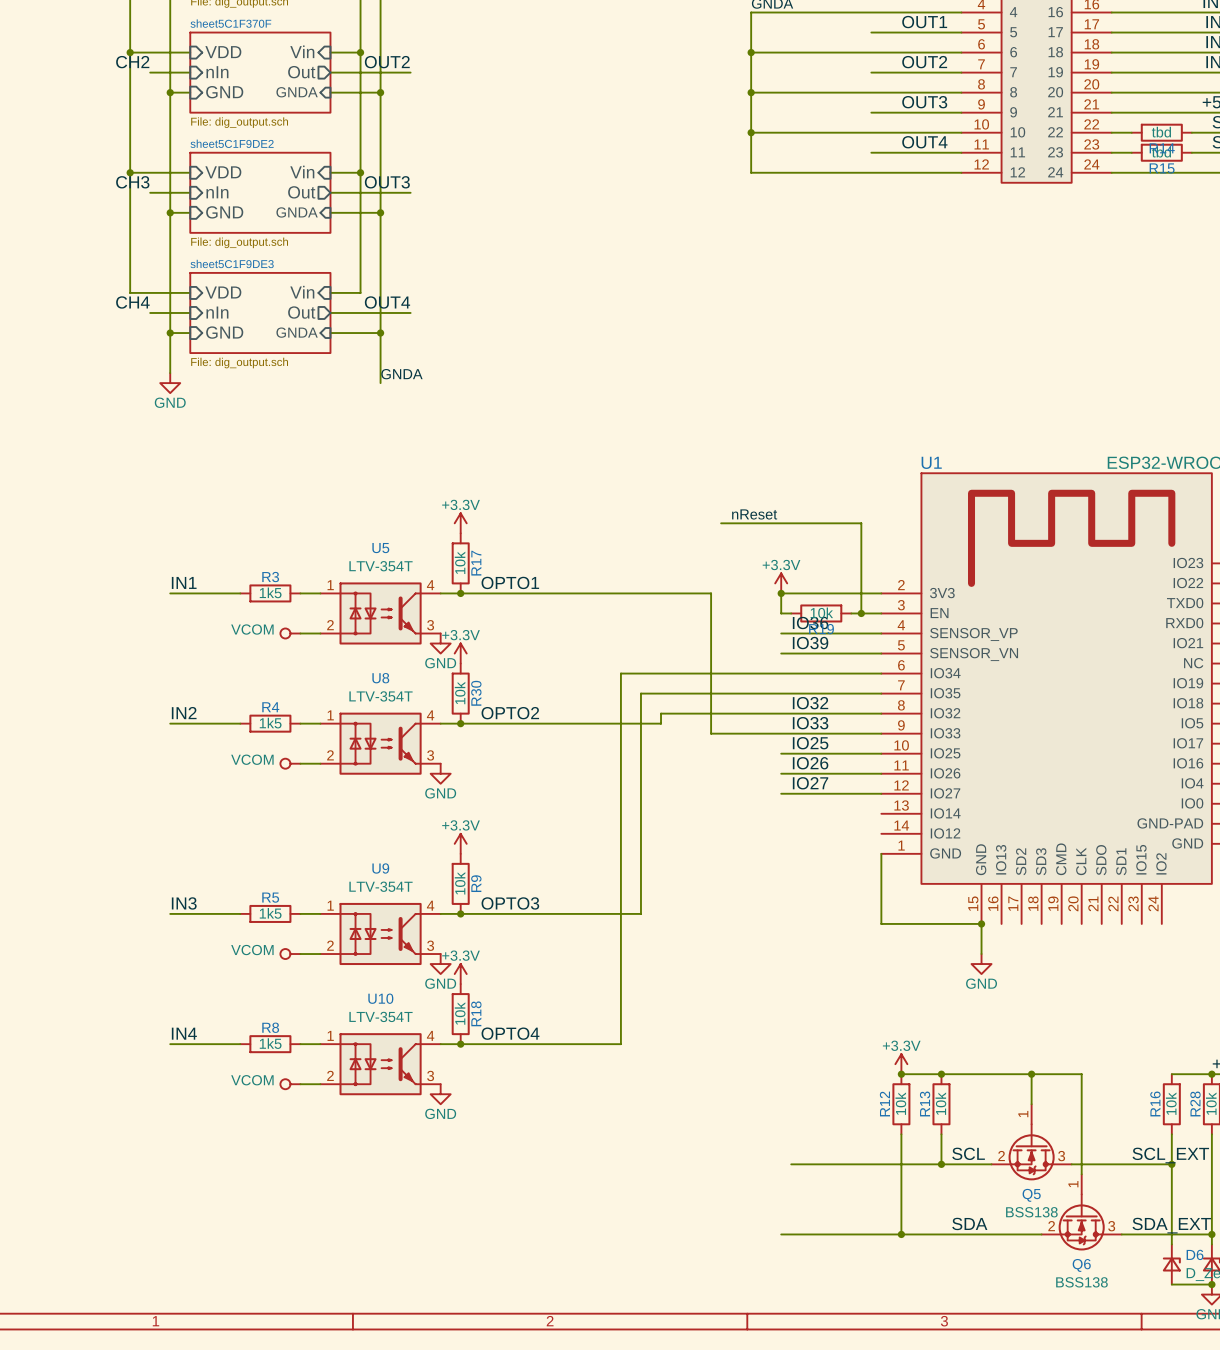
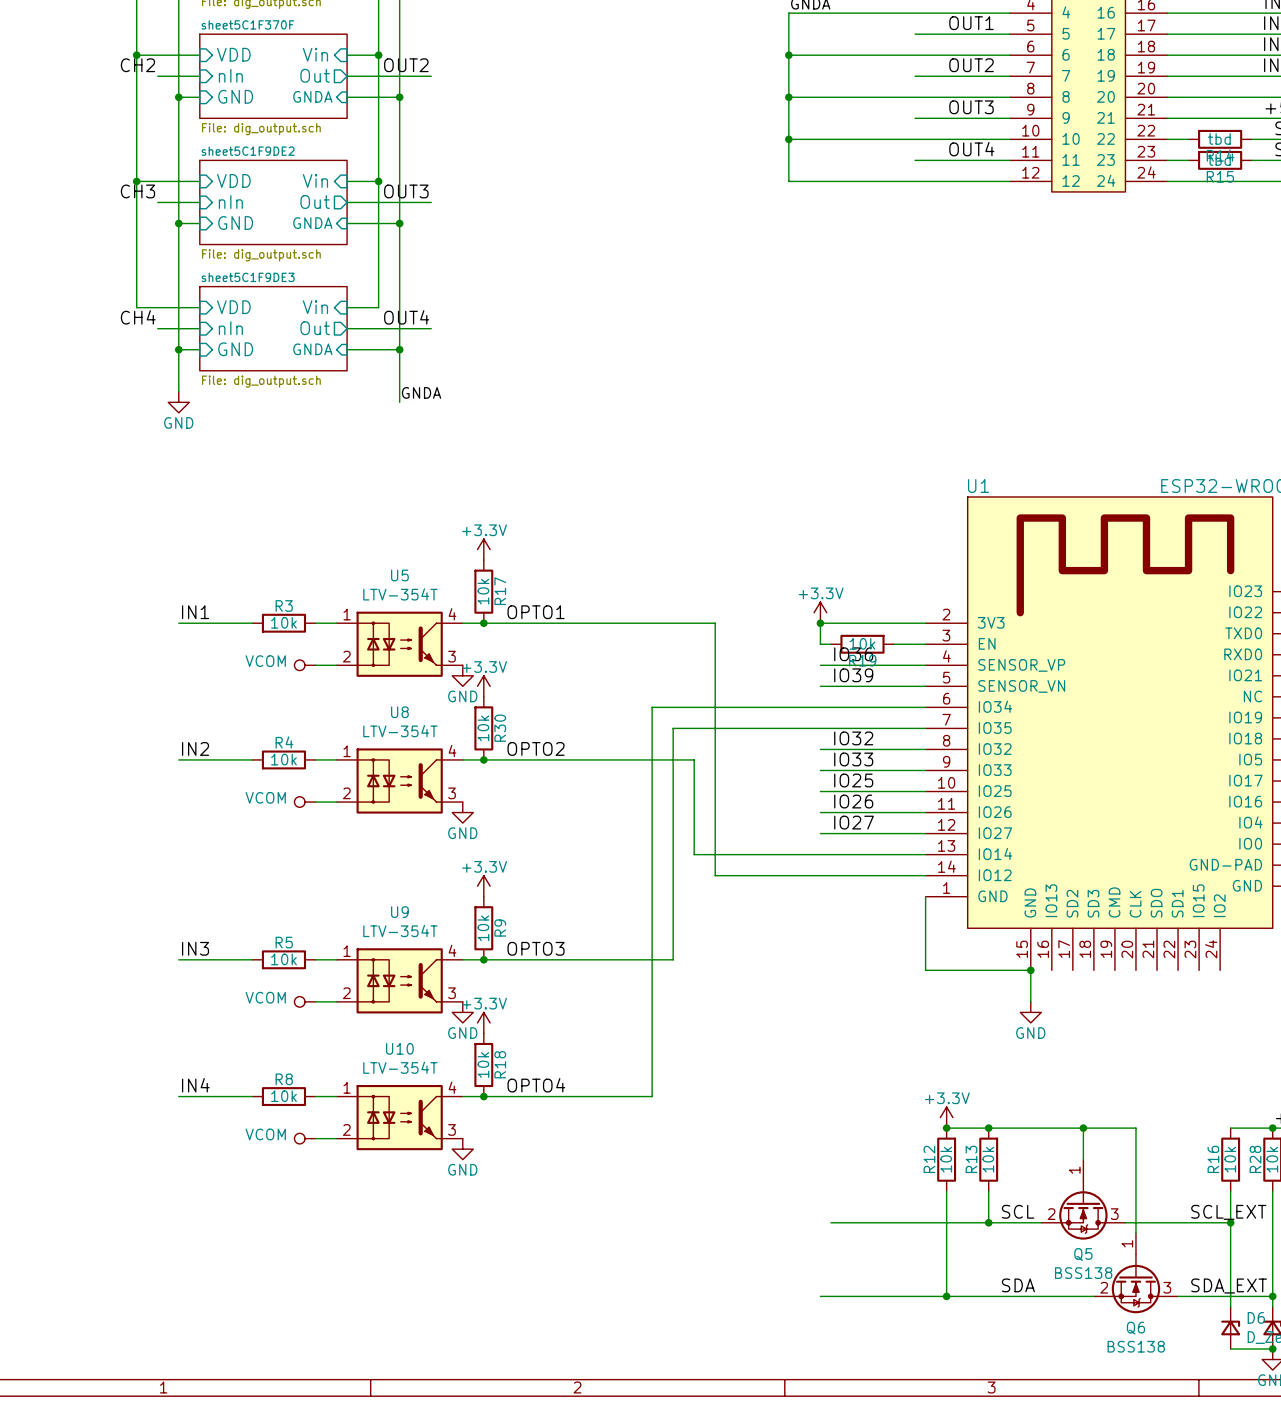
label: nReset (754, 514) -> none
wire: (721, 523) (861, 523) (861, 613) -> none
R3 value: 1k5 (270, 592) -> 10k (283, 622)
wire: (681, 593) (711, 593) (711, 733) (781, 733) -> (715, 623) (715, 875) (925, 875)
junction: (861, 613) -> none
wire: (781, 713) (661, 713) (661, 723) -> (925, 854) (694, 854) (694, 759)
R4 value: 1k5 (270, 723) -> 10k (283, 759)
R5 value: 1k5 (270, 913) -> 10k (283, 959)
R8 value: 1k5 (270, 1043) -> 10k (283, 1096)

